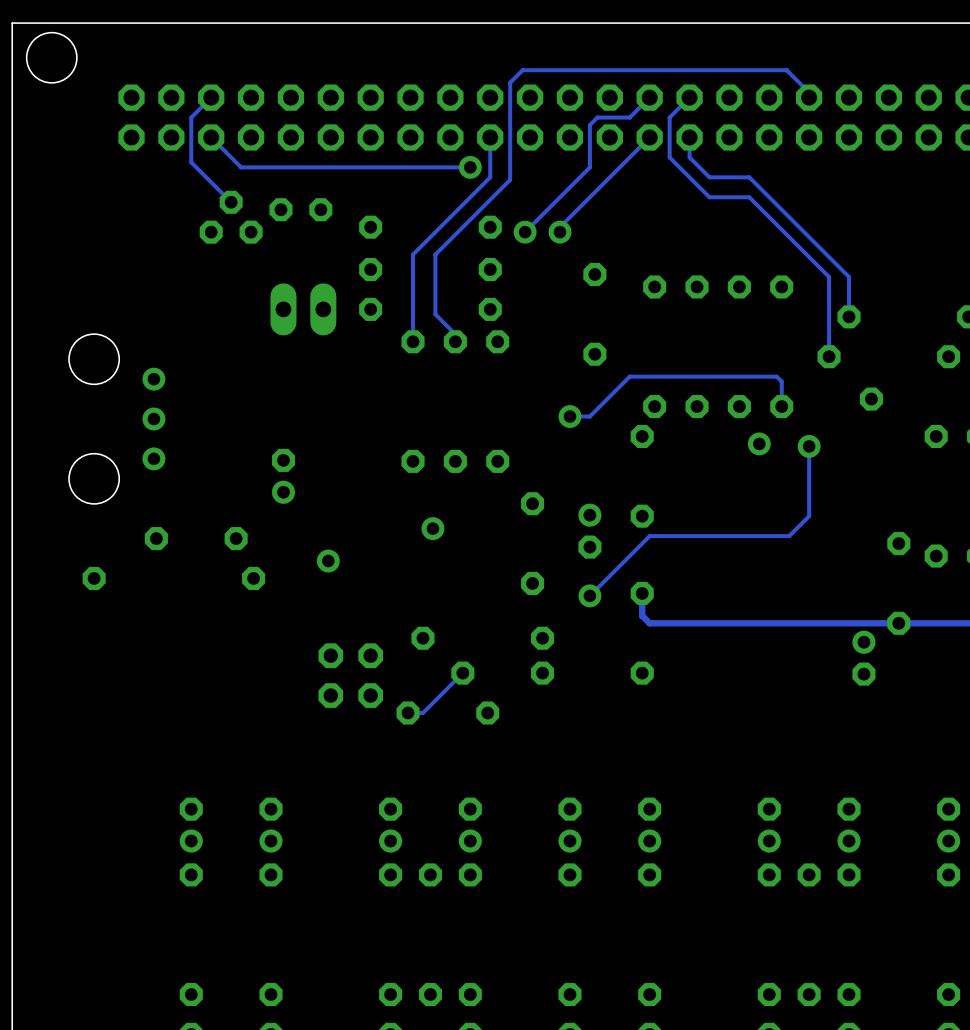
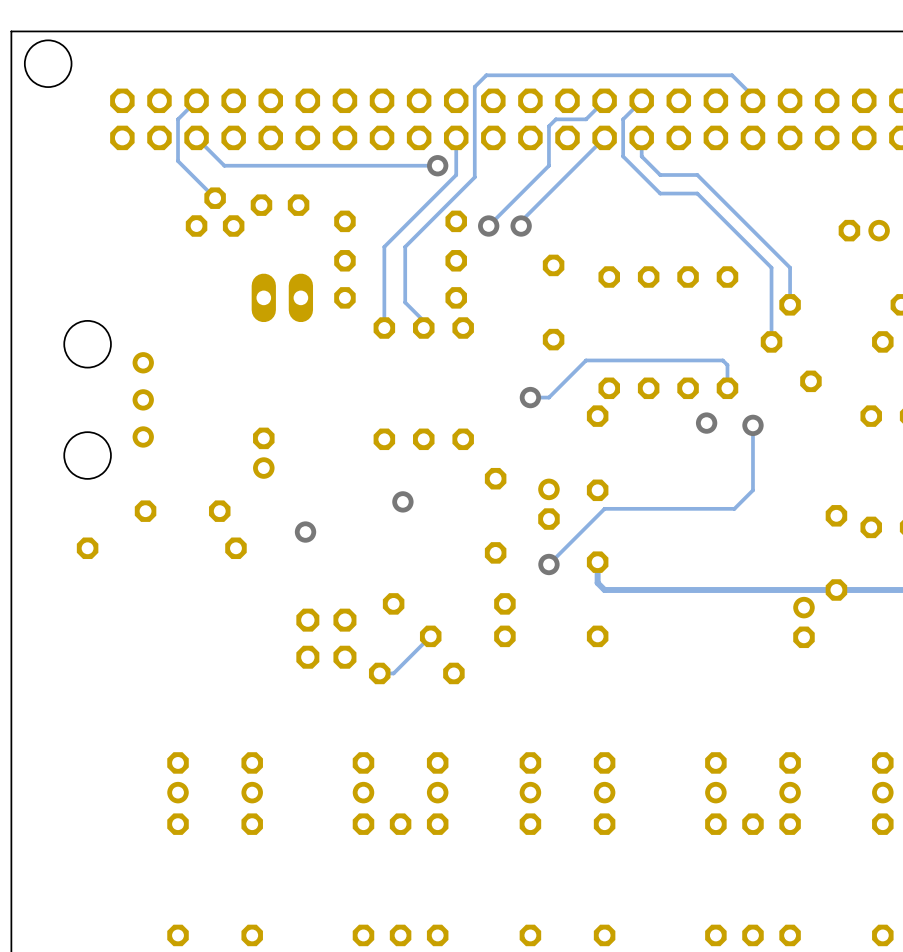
part: none -> (864, 230)

